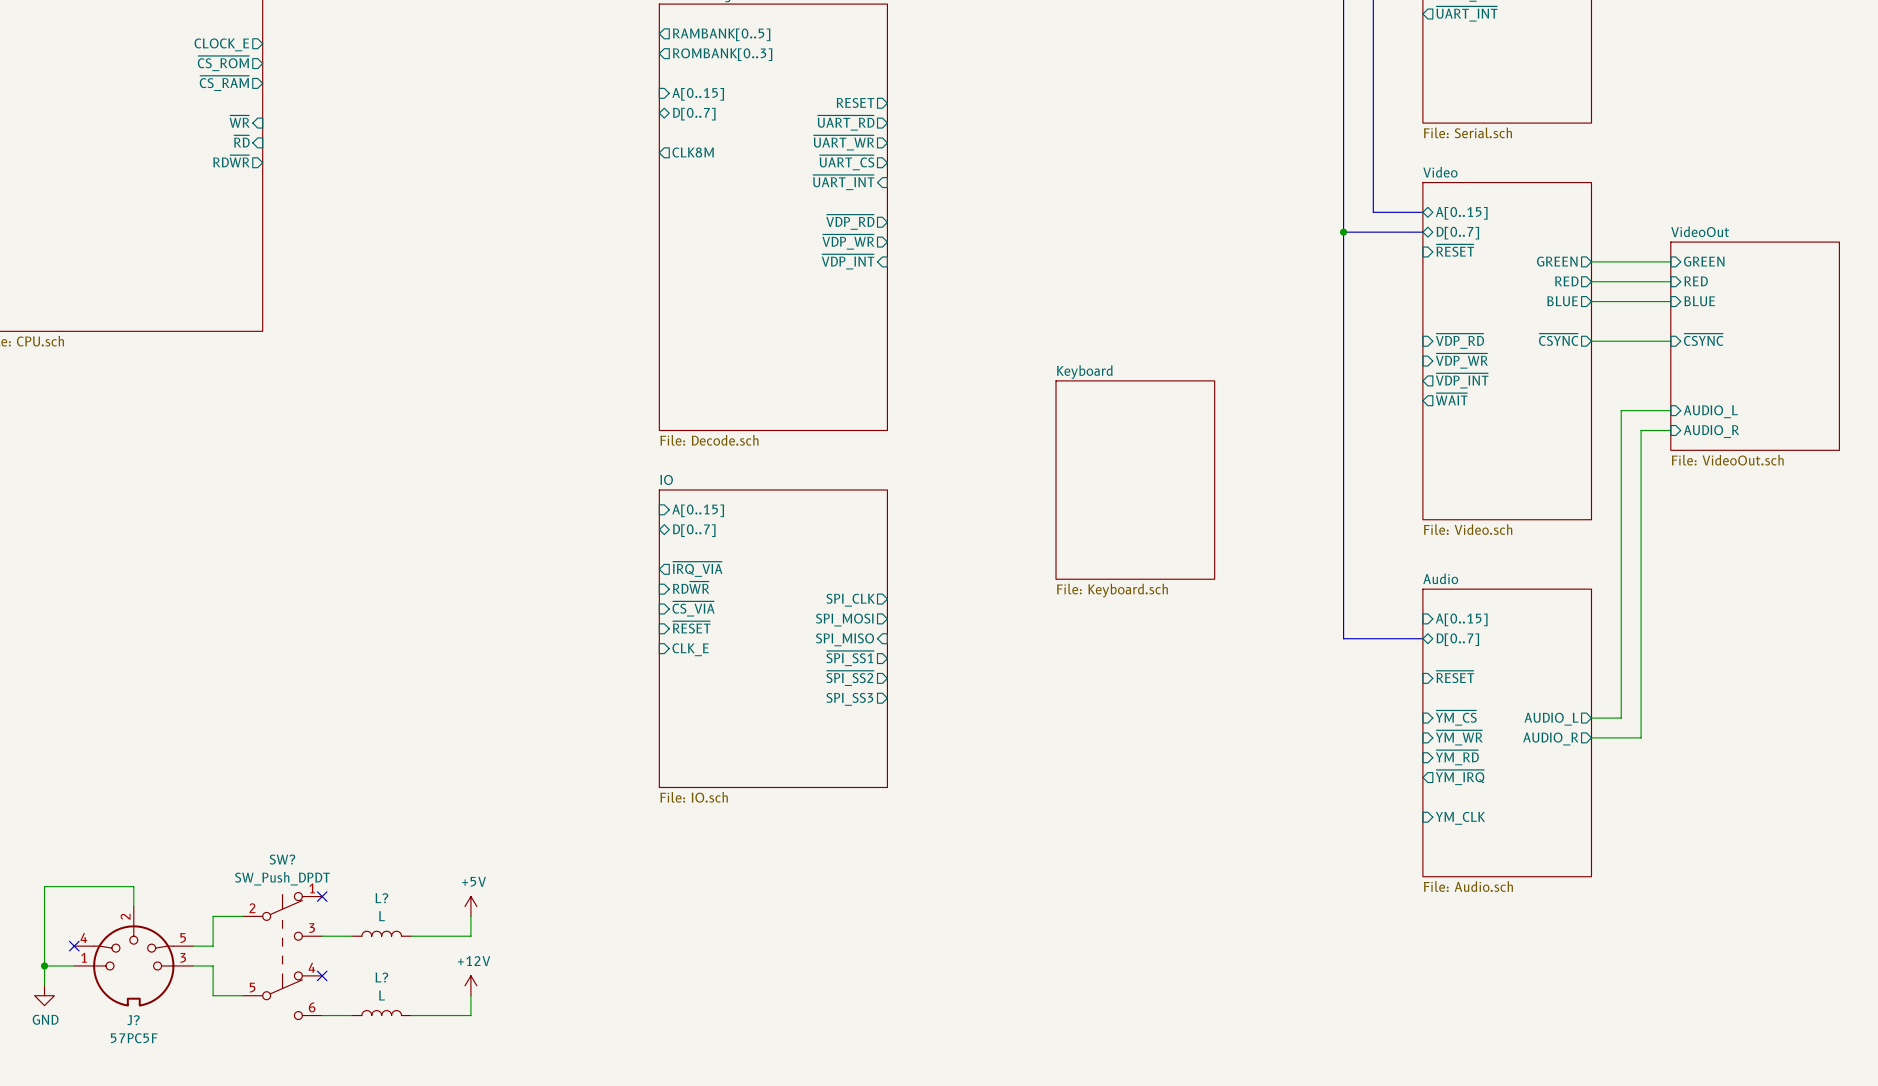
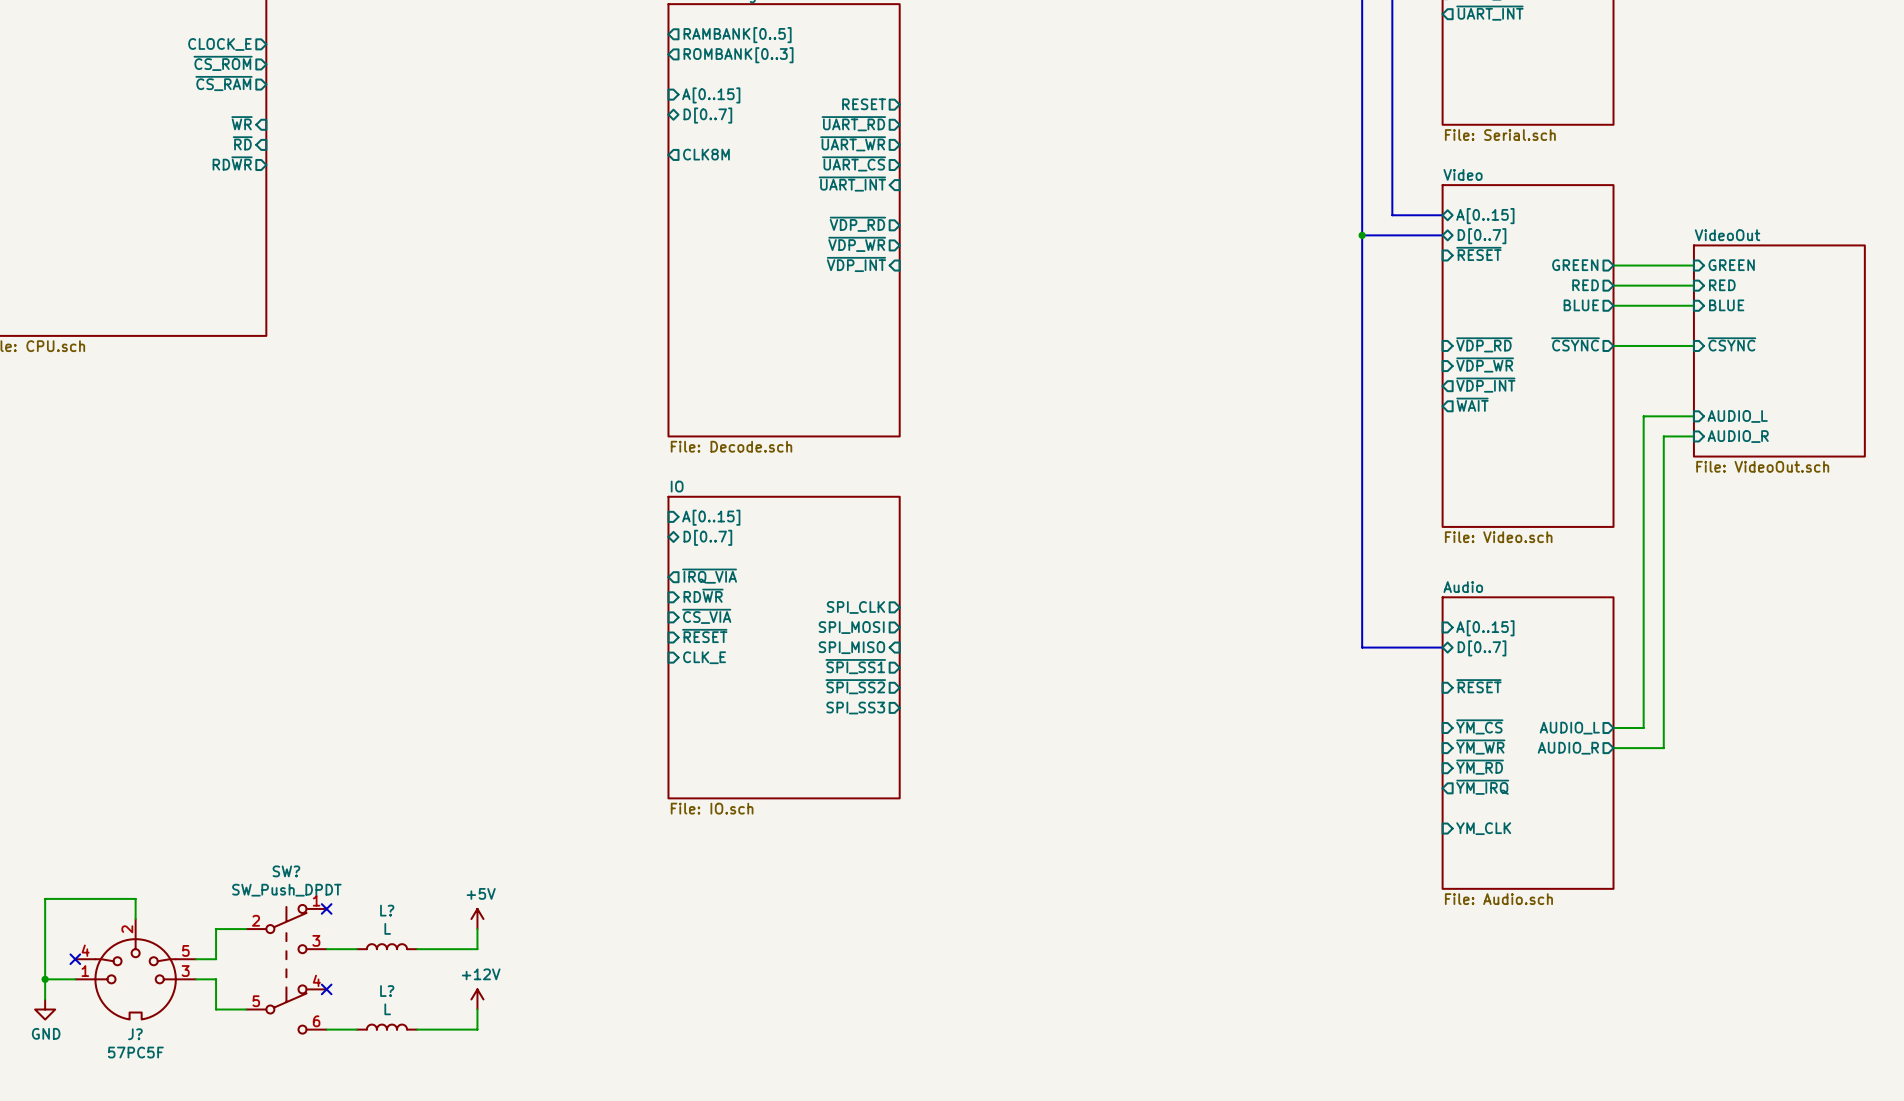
sheet Keyboard: File: Keyboard.sch (1135, 480) -> none

